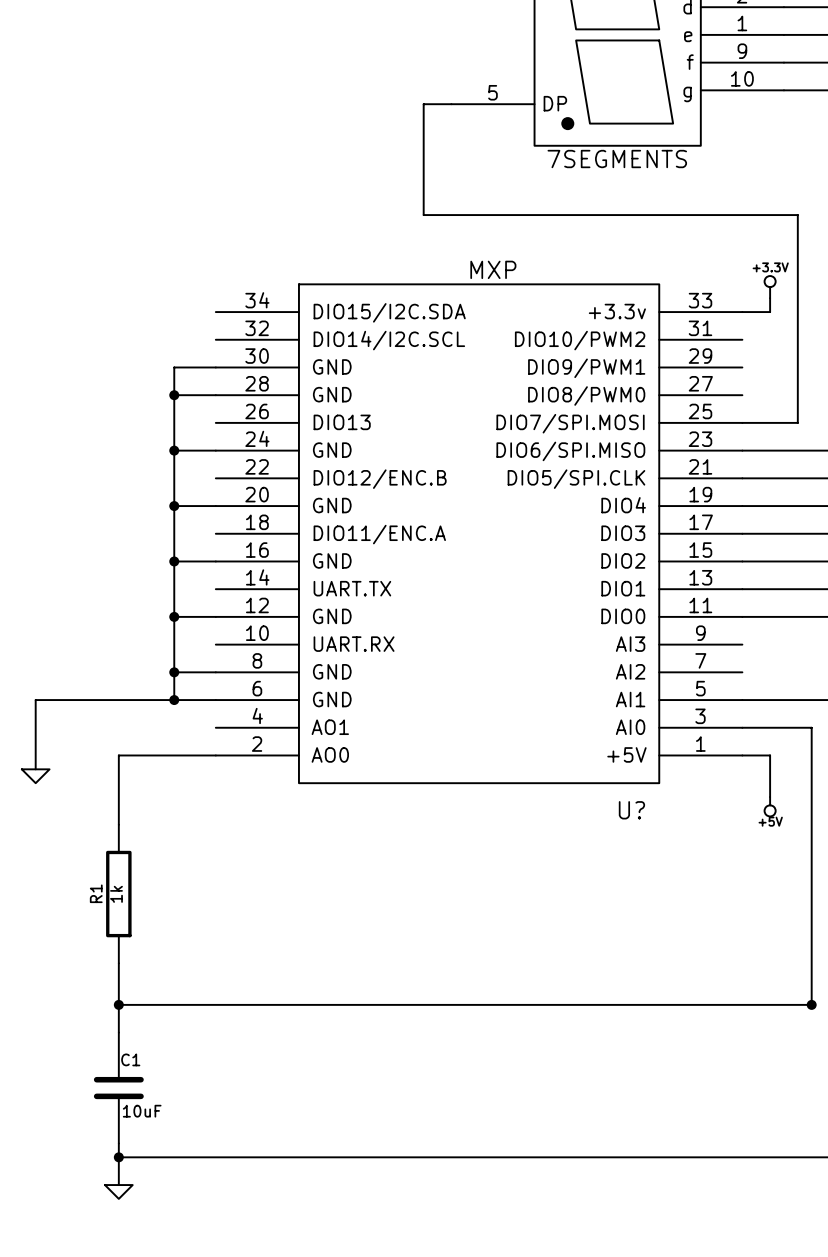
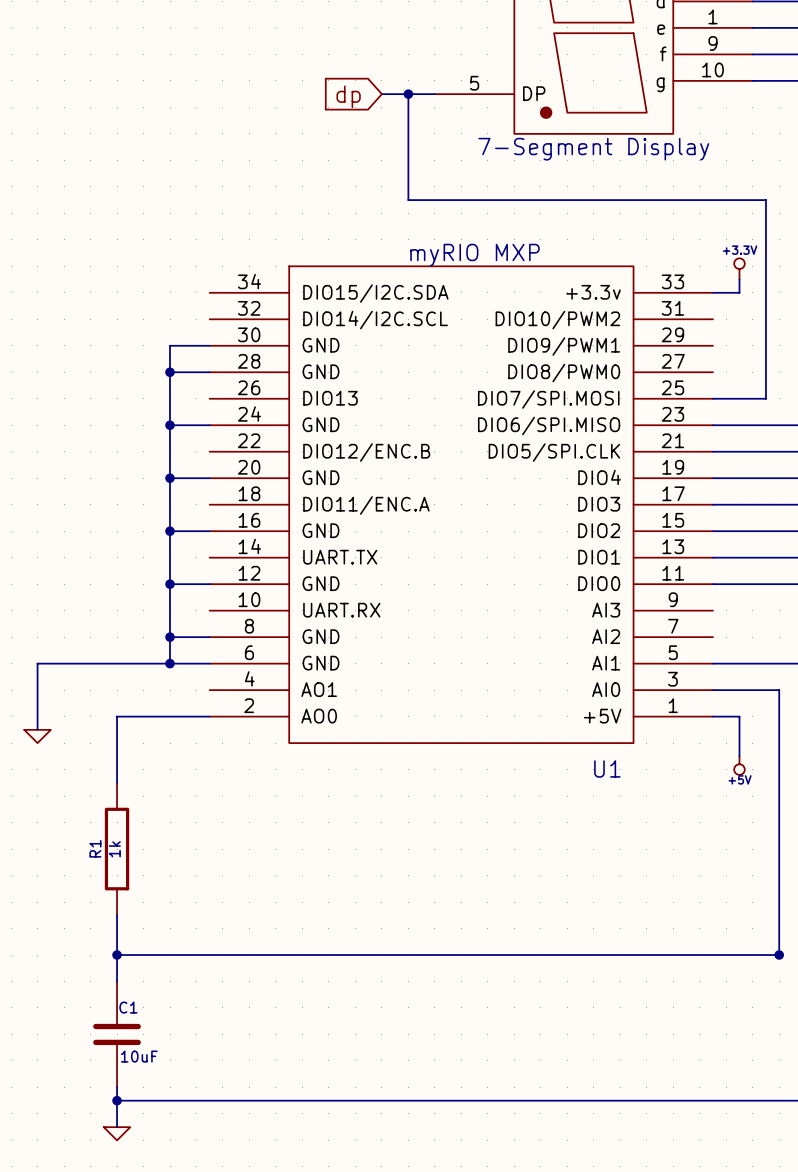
wire: none -> (381, 94) (408, 94)
junction: none -> (408, 94)
global label: none -> dp (348, 96)
part value: 7SEGMENTS (617, 159) -> 7-Segment Display (593, 149)
U? value: MXP (493, 269) -> myRIO MXP (474, 255)
U? name: U? (631, 810) -> U1 (607, 768)

